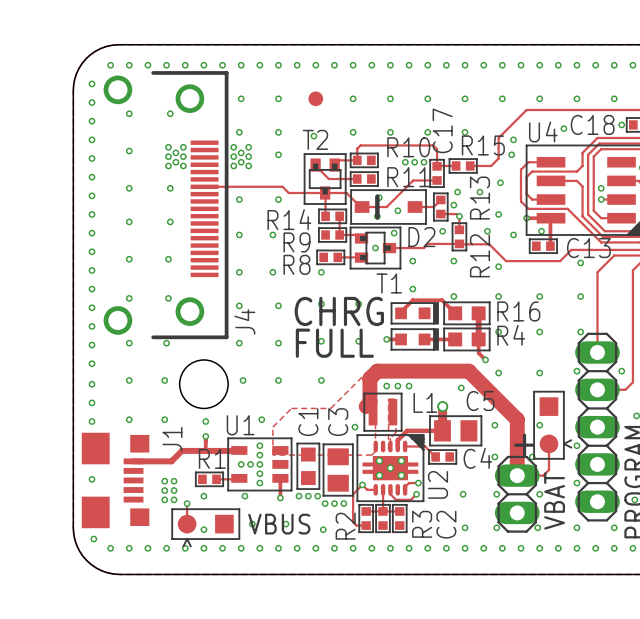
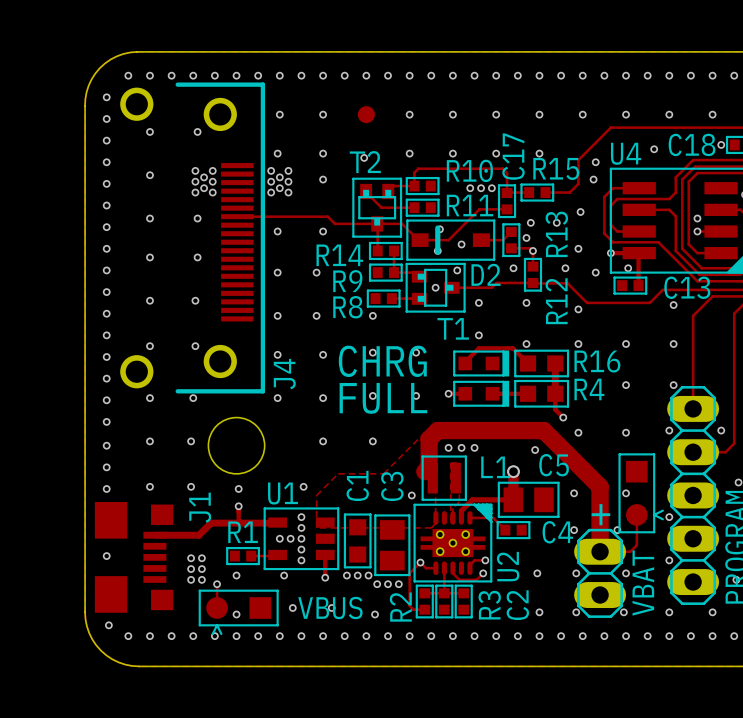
via: (498, 331) -> none
via: (243, 380) -> none

